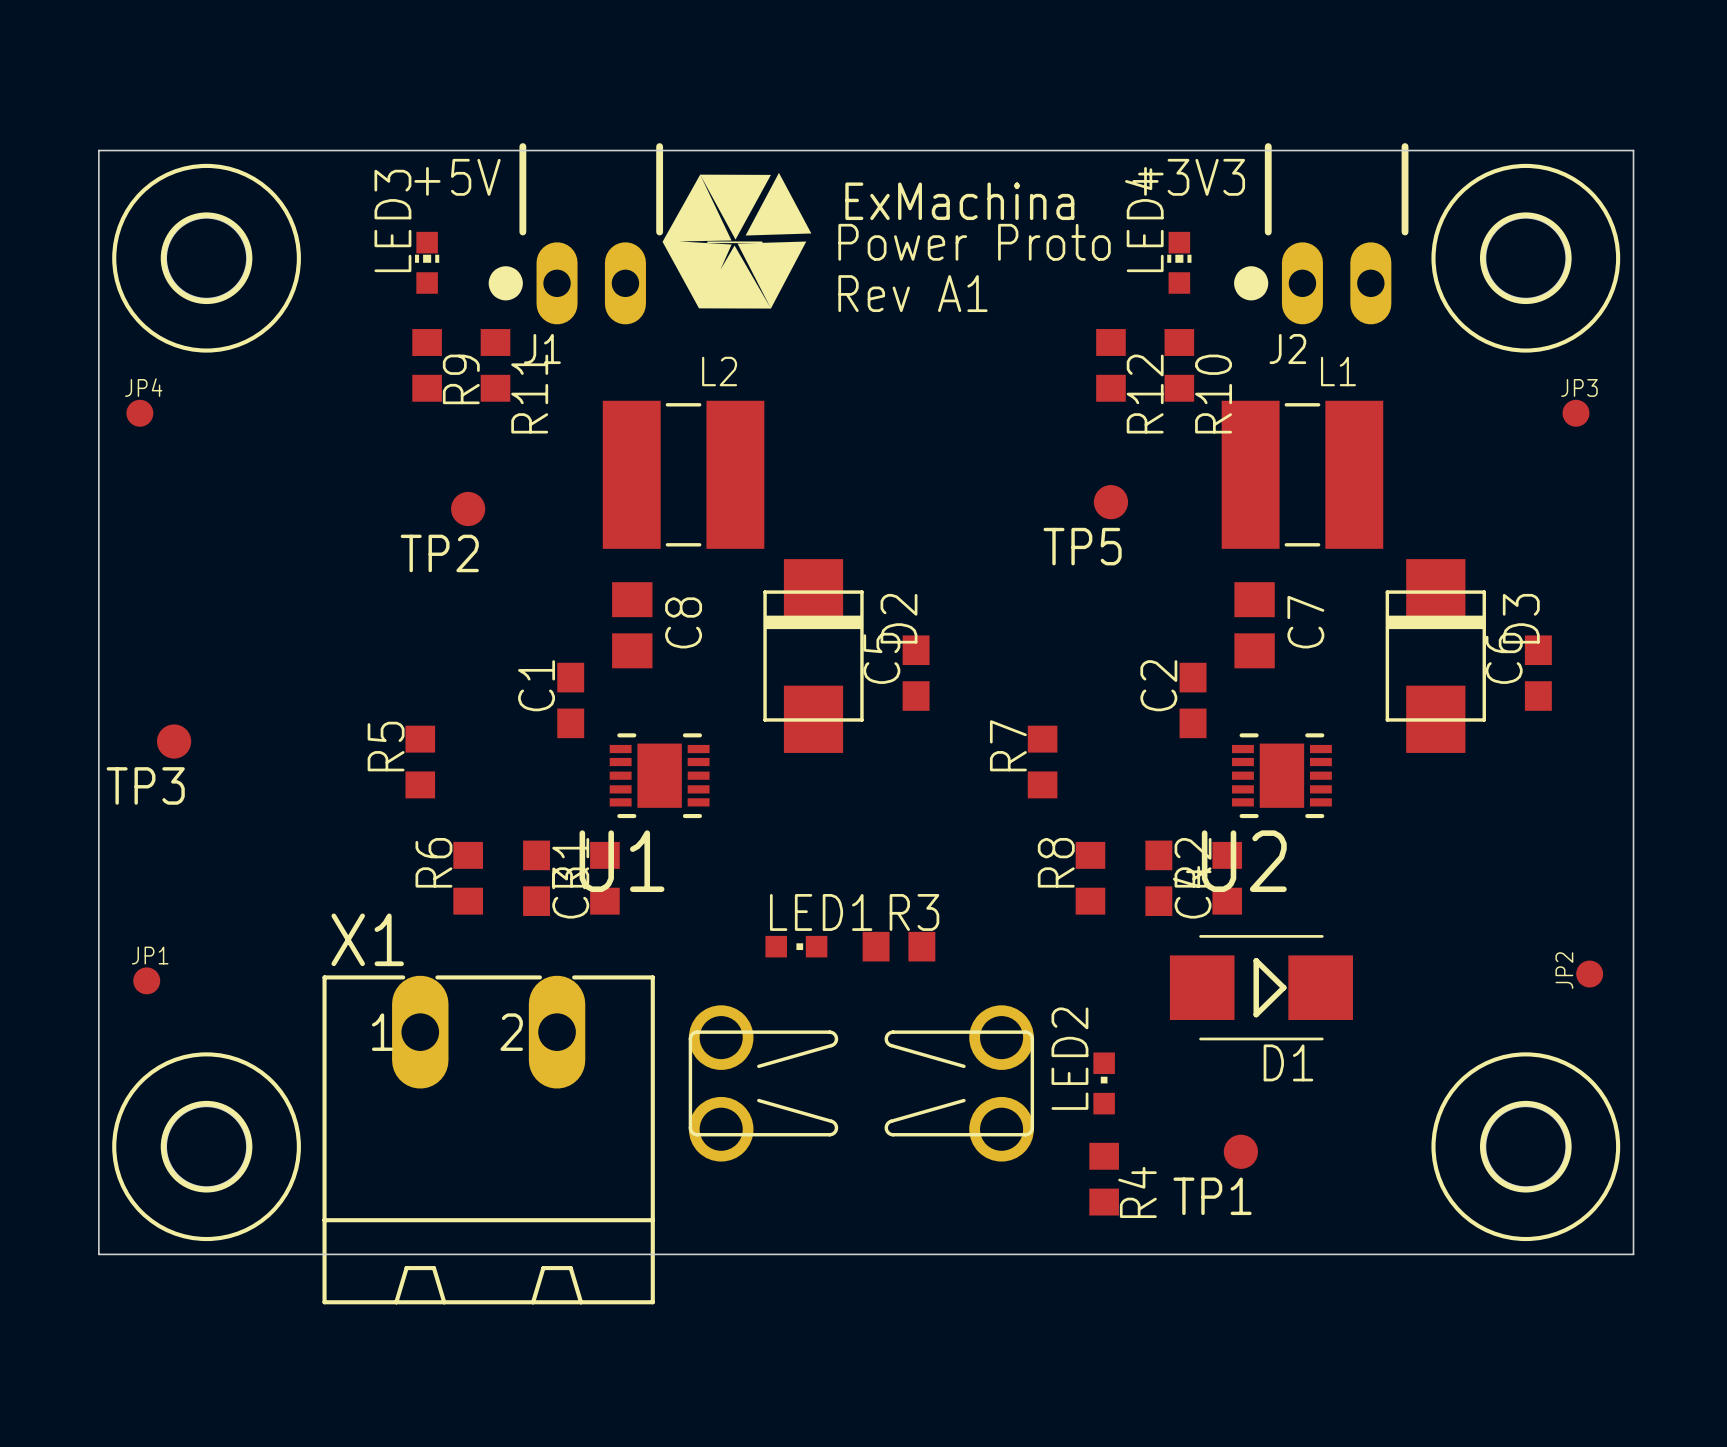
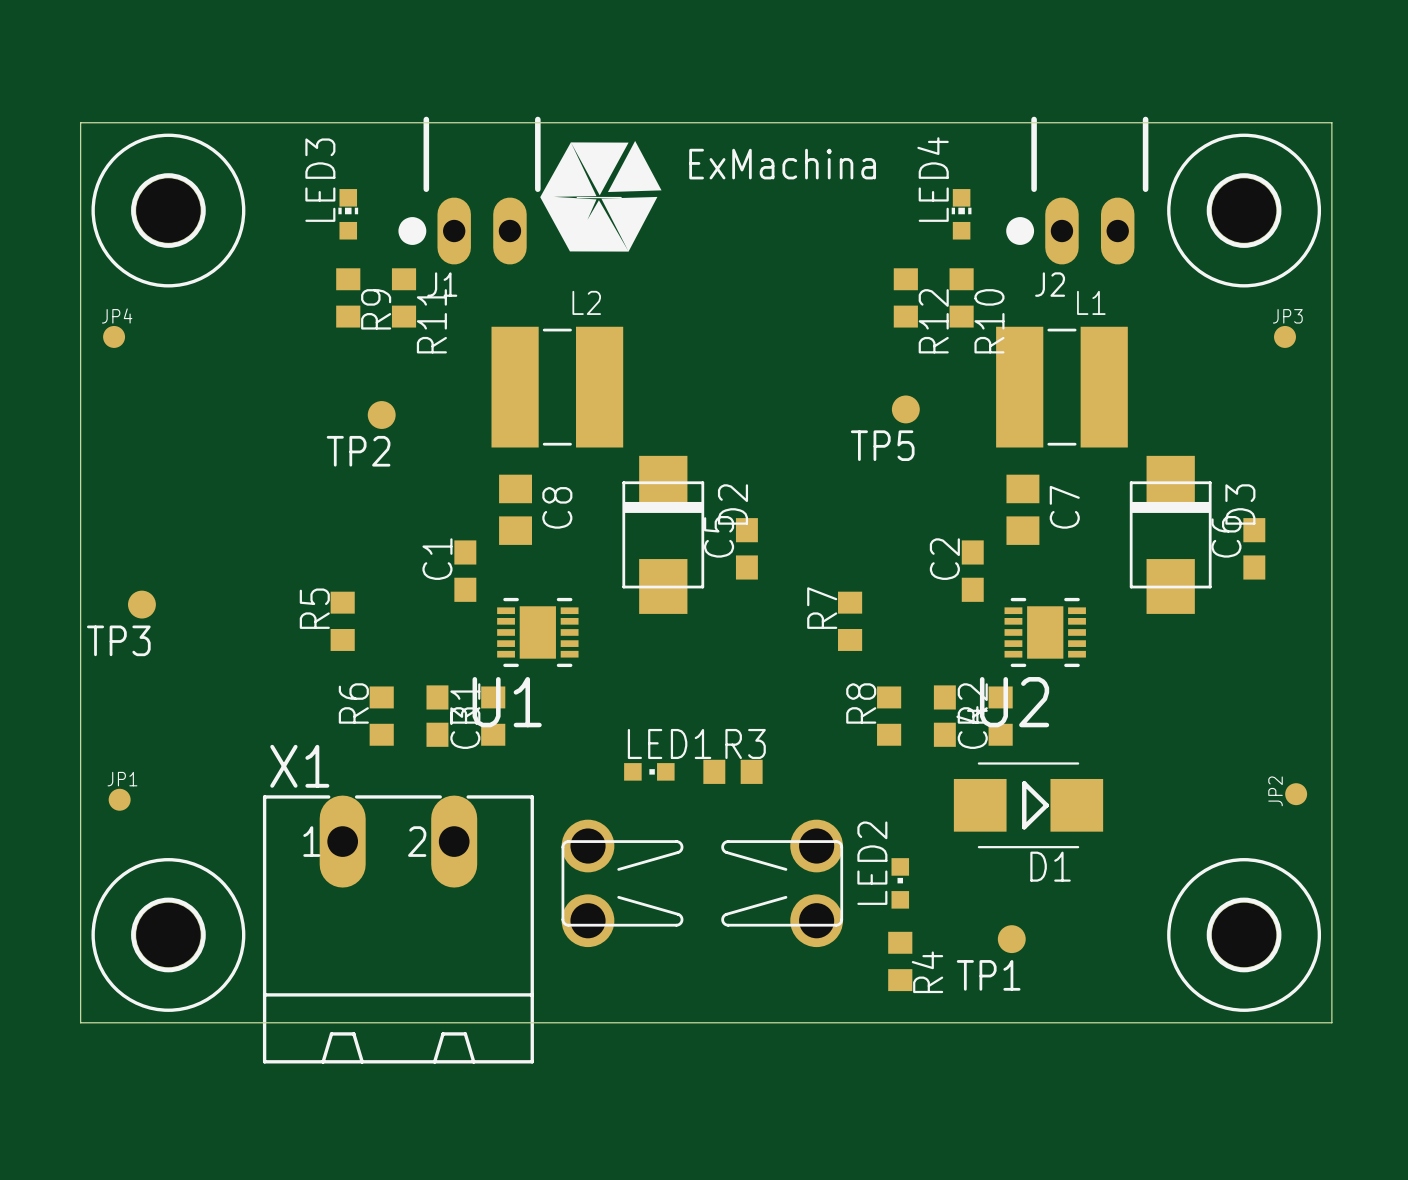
text: +5V (457, 177) -> none
text: +3V3 (1188, 177) -> none
text: Power Proto (974, 242) -> none
text: Rev A1 (912, 293) -> none

